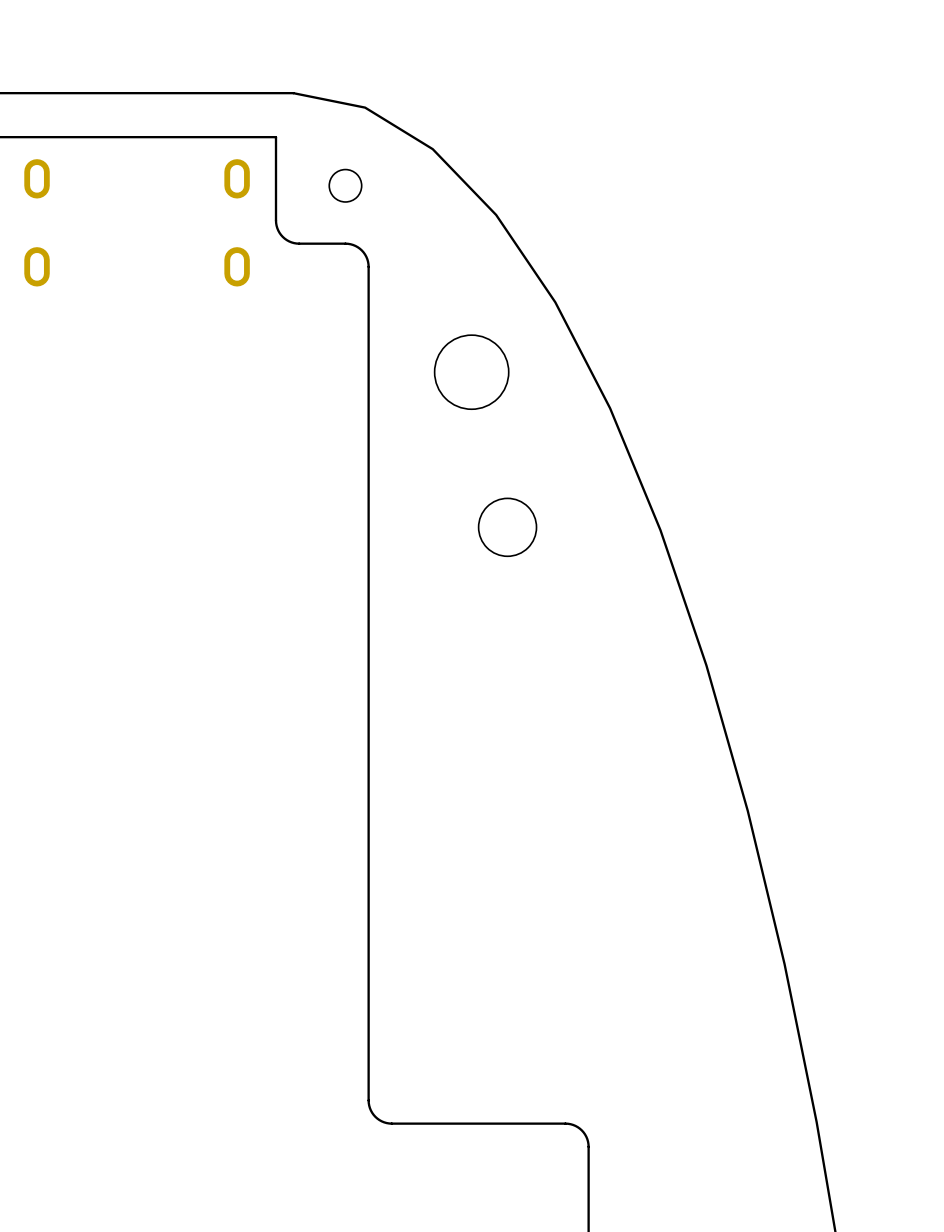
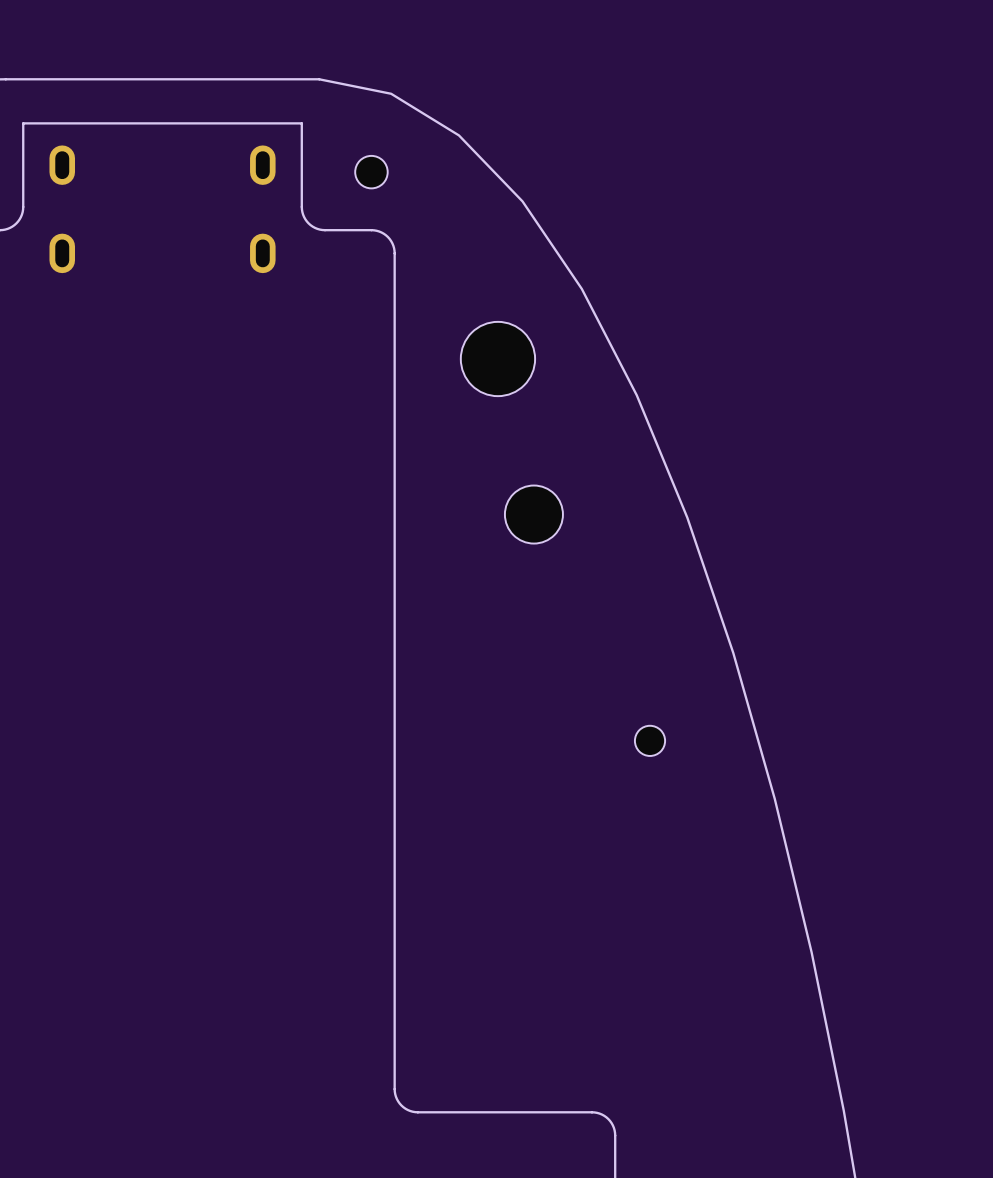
part: none -> (650, 740)

